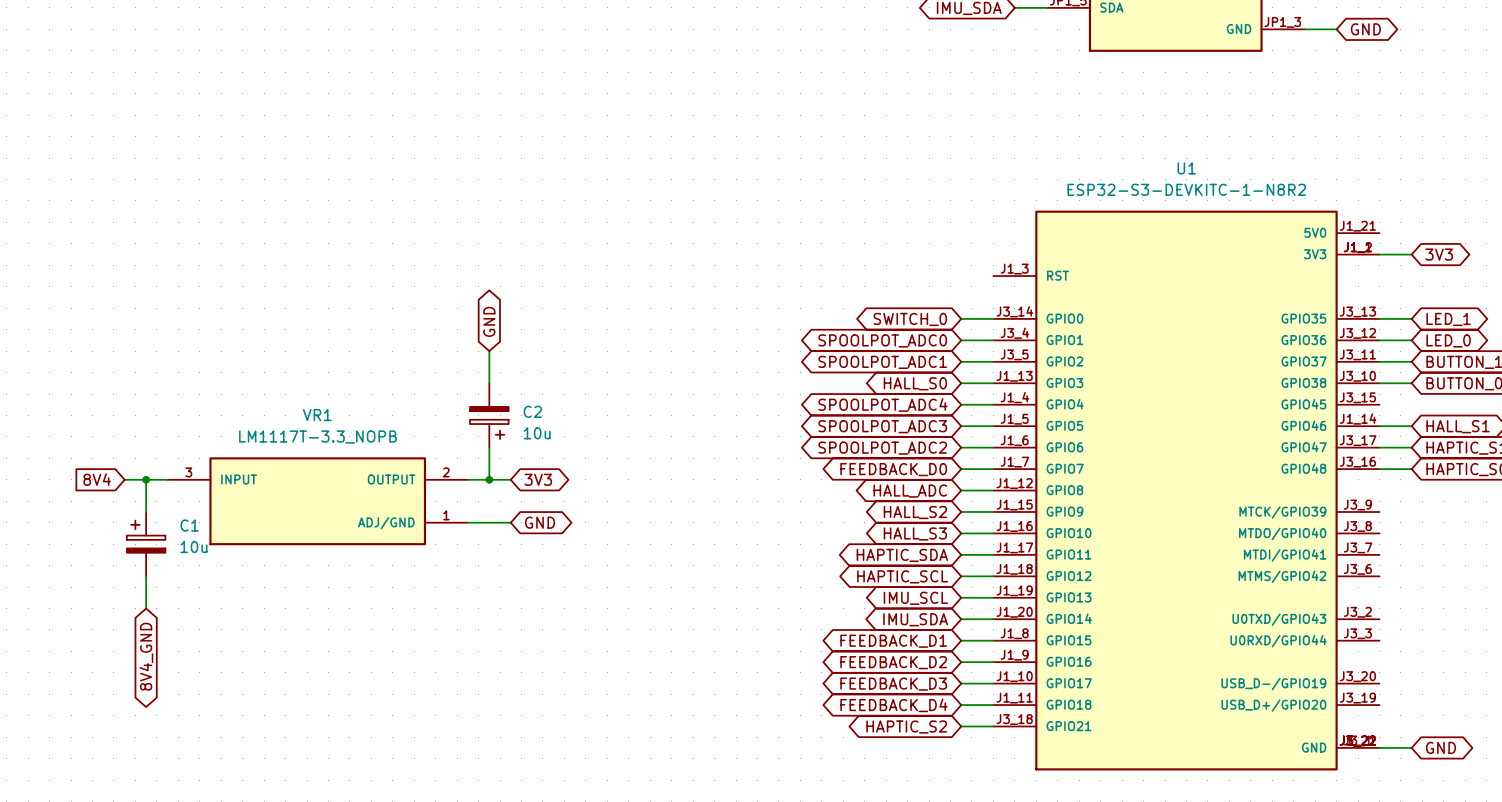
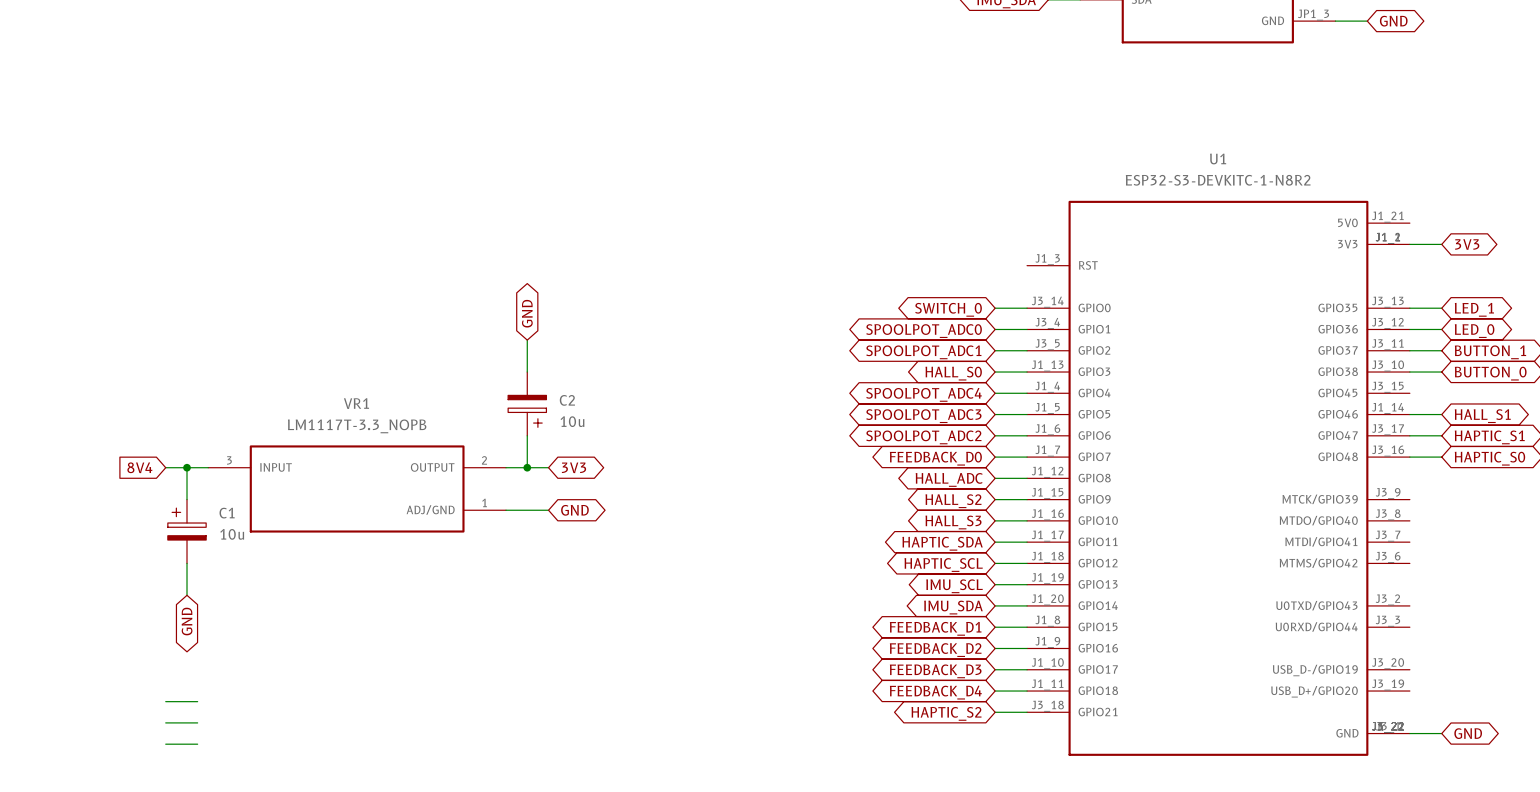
global label: 8V4_GND (146, 656) -> GND (187, 621)
wire: none -> (165, 701) (197, 701)
wire: none -> (165, 722) (197, 722)
wire: none -> (165, 744) (197, 744)

